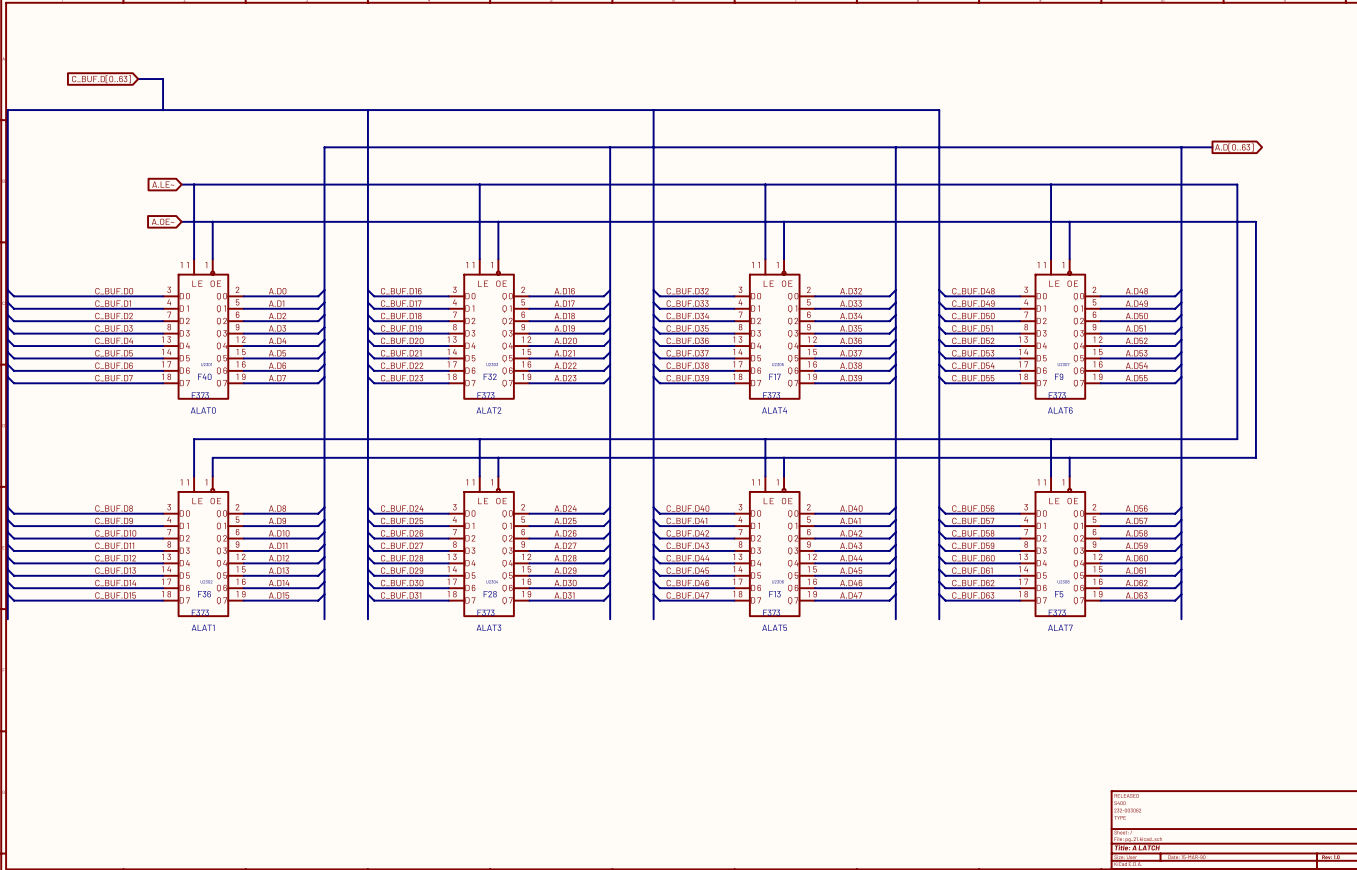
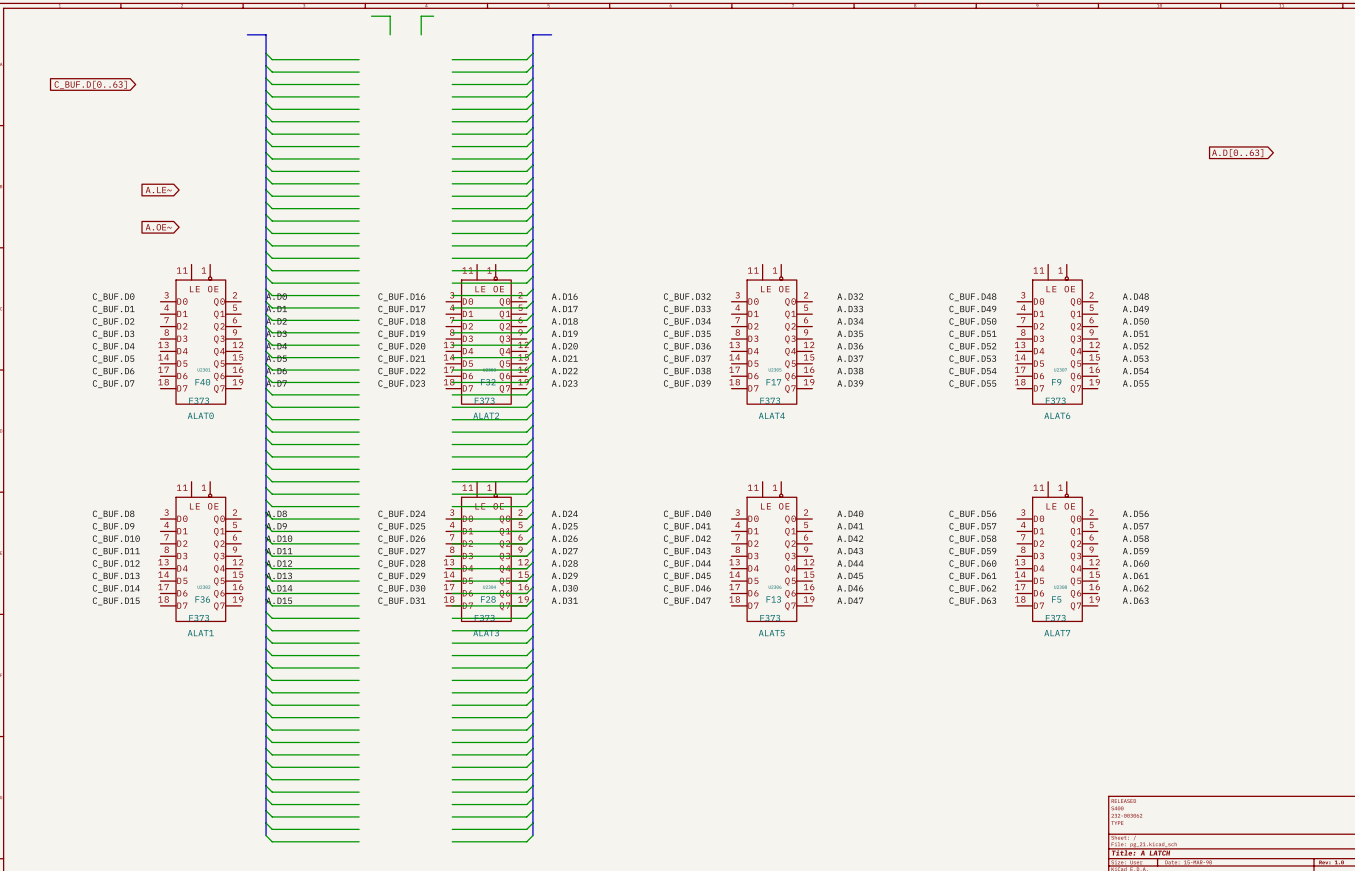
wire: none -> (371, 16) (390, 16) (390, 34)
wire: none -> (433, 16) (421, 16) (421, 34)
bus: none -> (247, 34) (266, 34) (266, 835)
bus: none -> (551, 34) (532, 34) (532, 835)
wire: none -> (266, 53) (272, 59) (359, 59)
wire: none -> (532, 53) (526, 59) (452, 59)
wire: none -> (266, 65) (272, 72) (359, 72)
wire: none -> (532, 65) (526, 72) (452, 72)
wire: none -> (266, 78) (272, 84) (359, 84)
wire: none -> (532, 78) (526, 84) (452, 84)
bus: (138, 79) (163, 79) (163, 110) -> none
wire: none -> (266, 90) (272, 96) (359, 96)
wire: none -> (532, 90) (526, 96) (452, 96)
wire: none -> (266, 103) (272, 109) (359, 109)
wire: none -> (532, 103) (526, 109) (452, 109)
wire: none -> (266, 115) (272, 121) (359, 121)
bus: (367, 110) (367, 619) -> none
wire: none -> (532, 115) (526, 121) (452, 121)
bus: (653, 110) (653, 619) -> none
wire: none -> (266, 127) (272, 134) (359, 134)
wire: none -> (532, 127) (526, 134) (452, 134)
wire: none -> (266, 140) (272, 146) (359, 146)
wire: none -> (532, 140) (526, 146) (452, 146)
wire: none -> (266, 152) (272, 158) (359, 158)
wire: none -> (532, 152) (526, 158) (452, 158)
bus: (610, 147) (610, 619) -> none
bus: (895, 147) (895, 619) -> none
bus: (1181, 147) (1181, 619) -> none
bus: (1212, 147) (324, 147) (324, 619) -> none
wire: none -> (266, 165) (272, 171) (359, 171)
wire: none -> (532, 165) (526, 171) (452, 171)
wire: none -> (266, 177) (272, 183) (359, 183)
wire: none -> (532, 177) (526, 183) (452, 183)
wire: (181, 184) (1237, 184) (1237, 439) (529, 439) -> (532, 438) (526, 444)
wire: (194, 184) (194, 259) -> none
wire: none -> (266, 190) (272, 196) (359, 196)
wire: (479, 184) (479, 259) -> none
wire: none -> (532, 190) (526, 196) (452, 196)
wire: (765, 184) (765, 259) -> none
wire: (1051, 184) (1051, 259) -> none
wire: none -> (266, 202) (272, 208) (359, 208)
wire: none -> (532, 202) (526, 208) (452, 208)
wire: none -> (266, 214) (272, 221) (359, 221)
wire: none -> (532, 214) (526, 221) (452, 221)
wire: (181, 221) (1255, 221) (1255, 457) (212, 457) (212, 476) -> none
wire: (212, 221) (212, 259) -> none
wire: none -> (266, 227) (272, 233) (359, 233)
wire: (498, 221) (498, 259) -> none
wire: none -> (532, 227) (526, 233) (452, 233)
wire: (784, 221) (784, 259) -> none
wire: (1069, 221) (1069, 259) -> none
wire: none -> (266, 239) (272, 245) (359, 245)
wire: none -> (532, 239) (526, 245) (452, 245)
wire: none -> (266, 252) (272, 258) (359, 258)
wire: none -> (532, 252) (526, 258) (452, 258)
wire: none -> (266, 264) (272, 270) (359, 270)
wire: none -> (532, 264) (526, 270) (452, 270)
wire: none -> (266, 276) (272, 283) (359, 283)
wire: none -> (532, 276) (526, 283) (452, 283)
wire: none -> (266, 289) (272, 295) (359, 295)
wire: none -> (532, 289) (526, 295) (452, 295)
wire: (7, 290) (14, 296) (163, 296) -> none
wire: (324, 290) (318, 296) (243, 296) -> none
wire: (367, 290) (374, 296) (448, 296) -> none
wire: (610, 290) (603, 296) (529, 296) -> none
wire: (653, 290) (659, 296) (734, 296) -> none
wire: (895, 290) (889, 296) (815, 296) -> none
wire: (939, 290) (945, 296) (1019, 296) -> none
wire: (1181, 290) (1175, 296) (1100, 296) -> none
wire: none -> (266, 301) (272, 307) (359, 307)
wire: none -> (532, 301) (526, 307) (452, 307)
wire: (7, 302) (14, 308) (163, 308) -> none
wire: (324, 302) (318, 308) (243, 308) -> none
wire: (367, 302) (374, 308) (448, 308) -> none
wire: (610, 302) (603, 308) (529, 308) -> none
wire: (653, 302) (659, 308) (734, 308) -> none
wire: (895, 302) (889, 308) (815, 308) -> none
wire: (939, 302) (945, 308) (1019, 308) -> none
wire: (1181, 302) (1175, 308) (1100, 308) -> none
wire: none -> (266, 314) (272, 320) (359, 320)
wire: none -> (532, 314) (526, 320) (452, 320)
wire: (7, 314) (14, 321) (163, 321) -> none
wire: (324, 314) (318, 321) (243, 321) -> none
wire: (367, 314) (374, 321) (448, 321) -> none
wire: (610, 314) (603, 321) (529, 321) -> none
wire: (653, 314) (659, 321) (734, 321) -> none
wire: (895, 314) (889, 321) (815, 321) -> none
wire: (939, 314) (945, 321) (1019, 321) -> none
wire: (1181, 314) (1175, 321) (1100, 321) -> none
wire: none -> (266, 326) (272, 332) (359, 332)
wire: none -> (532, 326) (526, 332) (452, 332)
wire: (7, 327) (14, 333) (163, 333) -> none
wire: (324, 327) (318, 333) (243, 333) -> none
wire: (367, 327) (374, 333) (448, 333) -> none
wire: (610, 327) (603, 333) (529, 333) -> none
wire: (653, 327) (659, 333) (734, 333) -> none
wire: (895, 327) (889, 333) (815, 333) -> none
wire: (939, 327) (945, 333) (1019, 333) -> none
wire: (1181, 327) (1175, 333) (1100, 333) -> none
wire: none -> (266, 339) (272, 345) (359, 345)
wire: none -> (532, 339) (526, 345) (452, 345)
wire: (7, 339) (14, 346) (163, 346) -> none
wire: (324, 339) (318, 346) (243, 346) -> none
wire: (367, 339) (374, 346) (448, 346) -> none
wire: (610, 339) (603, 346) (529, 346) -> none
wire: (653, 339) (659, 346) (734, 346) -> none
wire: (895, 339) (889, 346) (815, 346) -> none
wire: (939, 339) (945, 346) (1019, 346) -> none
wire: (1181, 339) (1175, 346) (1100, 346) -> none
wire: none -> (266, 351) (272, 357) (359, 357)
wire: none -> (532, 351) (526, 357) (452, 357)
wire: (7, 352) (14, 358) (163, 358) -> none
wire: (324, 352) (318, 358) (243, 358) -> none
wire: (367, 352) (374, 358) (448, 358) -> none
wire: (610, 352) (603, 358) (529, 358) -> none
wire: (653, 352) (659, 358) (734, 358) -> none
wire: (895, 352) (889, 358) (815, 358) -> none
wire: (939, 352) (945, 358) (1019, 358) -> none
wire: (1181, 352) (1175, 358) (1100, 358) -> none
wire: none -> (266, 363) (272, 370) (359, 370)
wire: none -> (532, 363) (526, 370) (452, 370)
wire: (7, 364) (14, 370) (163, 370) -> none
wire: (324, 364) (318, 370) (243, 370) -> none
wire: (367, 364) (374, 370) (448, 370) -> none
wire: (610, 364) (603, 370) (529, 370) -> none
wire: (653, 364) (659, 370) (734, 370) -> none
wire: (895, 364) (889, 370) (815, 370) -> none
wire: (939, 364) (945, 370) (1019, 370) -> none
wire: (1181, 364) (1175, 370) (1100, 370) -> none
wire: none -> (266, 376) (272, 382) (359, 382)
wire: none -> (532, 376) (526, 382) (452, 382)
wire: (7, 377) (14, 383) (163, 383) -> none
wire: (324, 377) (318, 383) (243, 383) -> none
wire: (367, 377) (374, 383) (448, 383) -> none
wire: (610, 377) (603, 383) (529, 383) -> none
wire: (653, 377) (659, 383) (734, 383) -> none
wire: (895, 377) (889, 383) (815, 383) -> none
wire: (939, 377) (945, 383) (1019, 383) -> none
wire: (1181, 377) (1175, 383) (1100, 383) -> none
wire: none -> (266, 388) (272, 394) (359, 394)
wire: none -> (532, 388) (526, 394) (452, 394)
wire: none -> (266, 401) (272, 407) (359, 407)
wire: none -> (532, 401) (526, 407) (452, 407)
wire: none -> (266, 413) (272, 419) (359, 419)
wire: none -> (532, 413) (526, 419) (452, 419)
wire: none -> (266, 425) (272, 432) (359, 432)
wire: none -> (532, 425) (526, 432) (452, 432)
wire: (274, 439) (194, 439) (194, 476) -> (272, 444) (266, 438)
wire: (361, 439) (454, 439) -> none
wire: (479, 439) (479, 476) -> none
wire: (765, 439) (765, 476) -> none
wire: (1051, 439) (1051, 476) -> none
wire: none -> (266, 450) (272, 456) (359, 456)
wire: none -> (532, 450) (526, 456) (452, 456)
wire: none -> (266, 463) (272, 469) (359, 469)
wire: (498, 457) (498, 476) -> none
wire: none -> (532, 463) (526, 469) (452, 469)
wire: (784, 457) (784, 476) -> none
wire: (1069, 457) (1069, 476) -> none
wire: none -> (266, 475) (272, 481) (359, 481)
wire: none -> (532, 475) (526, 481) (452, 481)
wire: none -> (266, 487) (272, 494) (359, 494)
wire: none -> (532, 487) (526, 494) (452, 494)
wire: none -> (266, 500) (272, 506) (359, 506)
wire: none -> (532, 500) (526, 506) (452, 506)
wire: (7, 507) (14, 513) (163, 513) -> none
wire: (324, 507) (318, 513) -> (359, 519) (315, 519)
wire: (367, 507) (374, 513) (448, 513) -> none
wire: none -> (532, 512) (526, 519) (452, 519)
wire: (610, 507) (603, 513) (529, 513) -> none
wire: (653, 507) (659, 513) (734, 513) -> none
wire: (895, 507) (889, 513) (815, 513) -> none
wire: (939, 507) (945, 513) (1019, 513) -> none
wire: (1181, 507) (1175, 513) (1100, 513) -> none
wire: (243, 513) (274, 513) -> (266, 512) (272, 519)
wire: (7, 519) (14, 526) (163, 526) -> none
wire: (324, 519) (318, 526) -> (359, 531) (315, 531)
wire: (367, 519) (374, 526) (448, 526) -> none
wire: none -> (532, 525) (526, 531) (452, 531)
wire: (610, 519) (603, 526) (529, 526) -> none
wire: (653, 519) (659, 526) (734, 526) -> none
wire: (895, 519) (889, 526) (815, 526) -> none
wire: (939, 519) (945, 526) (1019, 526) -> none
wire: (1181, 519) (1175, 526) (1100, 526) -> none
wire: (243, 526) (274, 526) -> (266, 525) (272, 531)
wire: (7, 532) (14, 538) (163, 538) -> none
wire: (324, 532) (318, 538) -> (359, 543) (315, 543)
wire: (367, 532) (374, 538) (448, 538) -> none
wire: none -> (532, 537) (526, 543) (452, 543)
wire: (610, 532) (603, 538) (529, 538) -> none
wire: (653, 532) (659, 538) (734, 538) -> none
wire: (895, 532) (889, 538) (815, 538) -> none
wire: (939, 532) (945, 538) (1019, 538) -> none
wire: (1181, 532) (1175, 538) (1100, 538) -> none
wire: (243, 538) (274, 538) -> (266, 537) (272, 543)
wire: (7, 544) (14, 550) (163, 550) -> none
wire: (324, 544) (318, 550) -> (359, 556) (315, 556)
wire: (367, 544) (374, 550) (448, 550) -> none
wire: none -> (532, 550) (526, 556) (452, 556)
wire: (610, 544) (603, 550) (529, 550) -> none
wire: (653, 544) (659, 550) (734, 550) -> none
wire: (895, 544) (889, 550) (815, 550) -> none
wire: (939, 544) (945, 550) (1019, 550) -> none
wire: (1181, 544) (1175, 550) (1100, 550) -> none
wire: (243, 550) (274, 550) -> (266, 550) (272, 556)
wire: (7, 557) (14, 563) (163, 563) -> none
wire: (324, 557) (318, 563) -> (359, 568) (315, 568)
wire: (367, 557) (374, 563) (448, 563) -> none
wire: none -> (532, 562) (526, 568) (452, 568)
wire: (610, 557) (603, 563) (529, 563) -> none
wire: (653, 557) (659, 563) (734, 563) -> none
wire: (895, 557) (889, 563) (815, 563) -> none
wire: (939, 557) (945, 563) (1019, 563) -> none
wire: (1181, 557) (1175, 563) (1100, 563) -> none
wire: (243, 563) (274, 563) -> (266, 562) (272, 568)
wire: (7, 569) (14, 575) (163, 575) -> none
wire: (324, 569) (318, 575) -> (359, 581) (315, 581)
wire: (367, 569) (374, 575) (448, 575) -> none
wire: none -> (532, 574) (526, 581) (452, 581)
wire: (610, 569) (603, 575) (529, 575) -> none
wire: (653, 569) (659, 575) (734, 575) -> none
wire: (895, 569) (889, 575) (815, 575) -> none
wire: (939, 569) (945, 575) (1019, 575) -> none
wire: (1181, 569) (1175, 575) (1100, 575) -> none
wire: (243, 575) (274, 575) -> (266, 574) (272, 581)
wire: (7, 582) (14, 588) (163, 588) -> none
wire: (324, 582) (318, 588) -> (359, 593) (315, 593)
wire: (367, 582) (374, 588) (448, 588) -> none
wire: none -> (532, 587) (526, 593) (452, 593)
wire: (610, 582) (603, 588) (529, 588) -> none
wire: (653, 582) (659, 588) (734, 588) -> none
wire: (895, 582) (889, 588) (815, 588) -> none
wire: (939, 582) (945, 588) (1019, 588) -> none
wire: (1181, 582) (1175, 588) (1100, 588) -> none
wire: (243, 588) (274, 588) -> (266, 587) (272, 593)
wire: (7, 594) (14, 600) (163, 600) -> none
wire: (324, 594) (318, 600) -> (359, 605) (315, 605)
wire: (367, 594) (374, 600) (448, 600) -> none
wire: none -> (532, 599) (526, 605) (452, 605)
wire: (610, 594) (603, 600) (529, 600) -> none
wire: (653, 594) (659, 600) (734, 600) -> none
wire: (895, 594) (889, 600) (815, 600) -> none
wire: (939, 594) (945, 600) (1019, 600) -> none
wire: (1181, 594) (1175, 600) (1100, 600) -> none
wire: (243, 600) (274, 600) -> (266, 599) (272, 605)
wire: none -> (266, 612) (272, 618) (359, 618)
wire: none -> (532, 612) (526, 618) (452, 618)
bus: (7, 619) (7, 110) (939, 110) (939, 619) -> none
wire: none -> (266, 624) (272, 630) (359, 630)
wire: none -> (532, 624) (526, 630) (452, 630)
wire: none -> (266, 636) (272, 643) (359, 643)
wire: none -> (532, 636) (526, 643) (452, 643)
wire: none -> (266, 649) (272, 655) (359, 655)
wire: none -> (532, 649) (526, 655) (452, 655)
wire: none -> (266, 661) (272, 667) (359, 667)
wire: none -> (532, 661) (526, 667) (452, 667)
wire: none -> (266, 674) (272, 680) (359, 680)
wire: none -> (532, 674) (526, 680) (452, 680)
wire: none -> (266, 686) (272, 692) (359, 692)
wire: none -> (532, 686) (526, 692) (452, 692)
wire: none -> (266, 699) (272, 705) (359, 705)
wire: none -> (532, 699) (526, 705) (452, 705)
wire: none -> (266, 711) (272, 717) (359, 717)
wire: none -> (532, 711) (526, 717) (452, 717)
wire: none -> (266, 723) (272, 730) (359, 730)
wire: none -> (532, 723) (526, 730) (452, 730)
wire: none -> (266, 736) (272, 742) (359, 742)
wire: none -> (532, 736) (526, 742) (452, 742)
wire: none -> (266, 748) (272, 754) (359, 754)
wire: none -> (532, 748) (526, 754) (452, 754)
wire: none -> (266, 761) (272, 767) (359, 767)
wire: none -> (532, 761) (526, 767) (452, 767)
wire: none -> (266, 773) (272, 779) (359, 779)
wire: none -> (532, 773) (526, 779) (452, 779)
wire: none -> (266, 785) (272, 792) (359, 792)
wire: none -> (532, 785) (526, 792) (452, 792)
wire: none -> (266, 798) (272, 804) (359, 804)
wire: none -> (532, 798) (526, 804) (452, 804)
wire: none -> (266, 810) (272, 816) (359, 816)
wire: none -> (532, 810) (526, 816) (452, 816)
wire: none -> (266, 823) (272, 829) (359, 829)
wire: none -> (532, 823) (526, 829) (452, 829)
wire: none -> (266, 835) (272, 841) (359, 841)
wire: none -> (532, 835) (526, 841) (452, 841)

